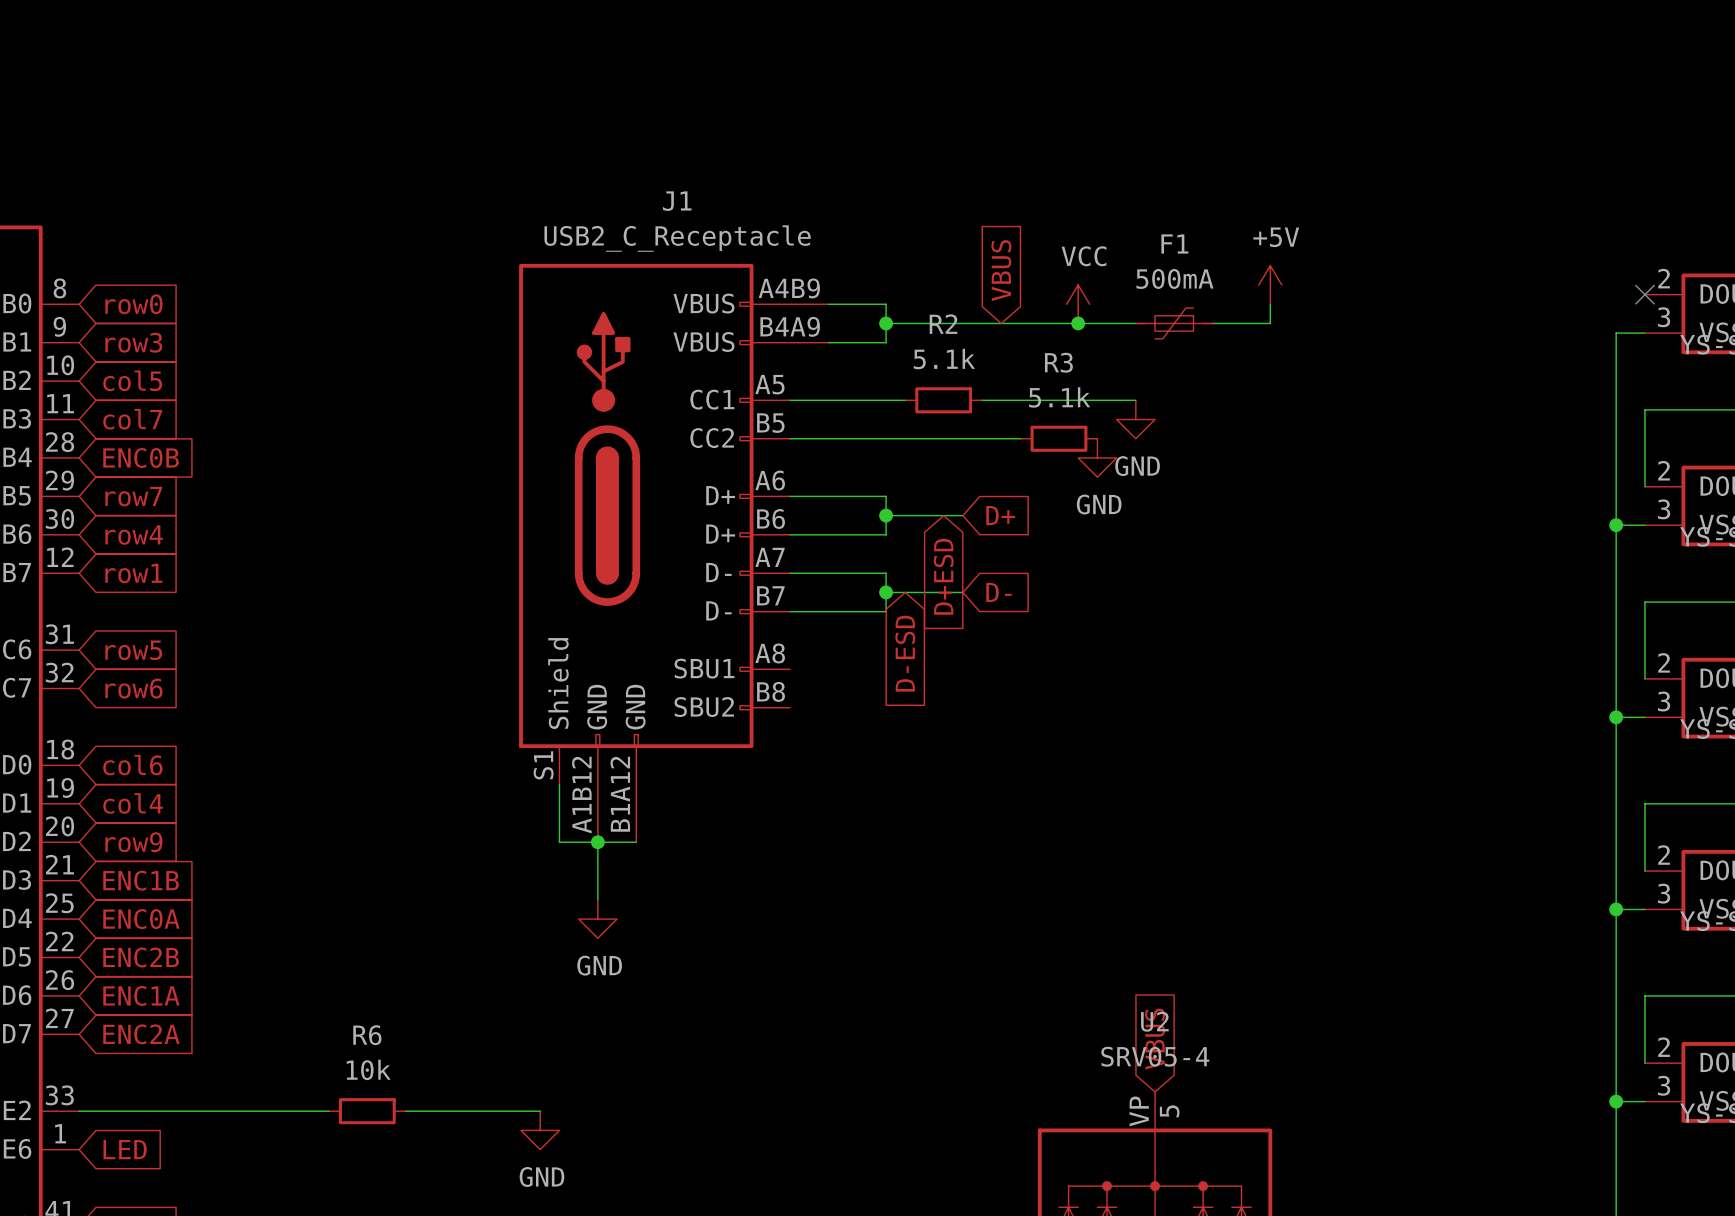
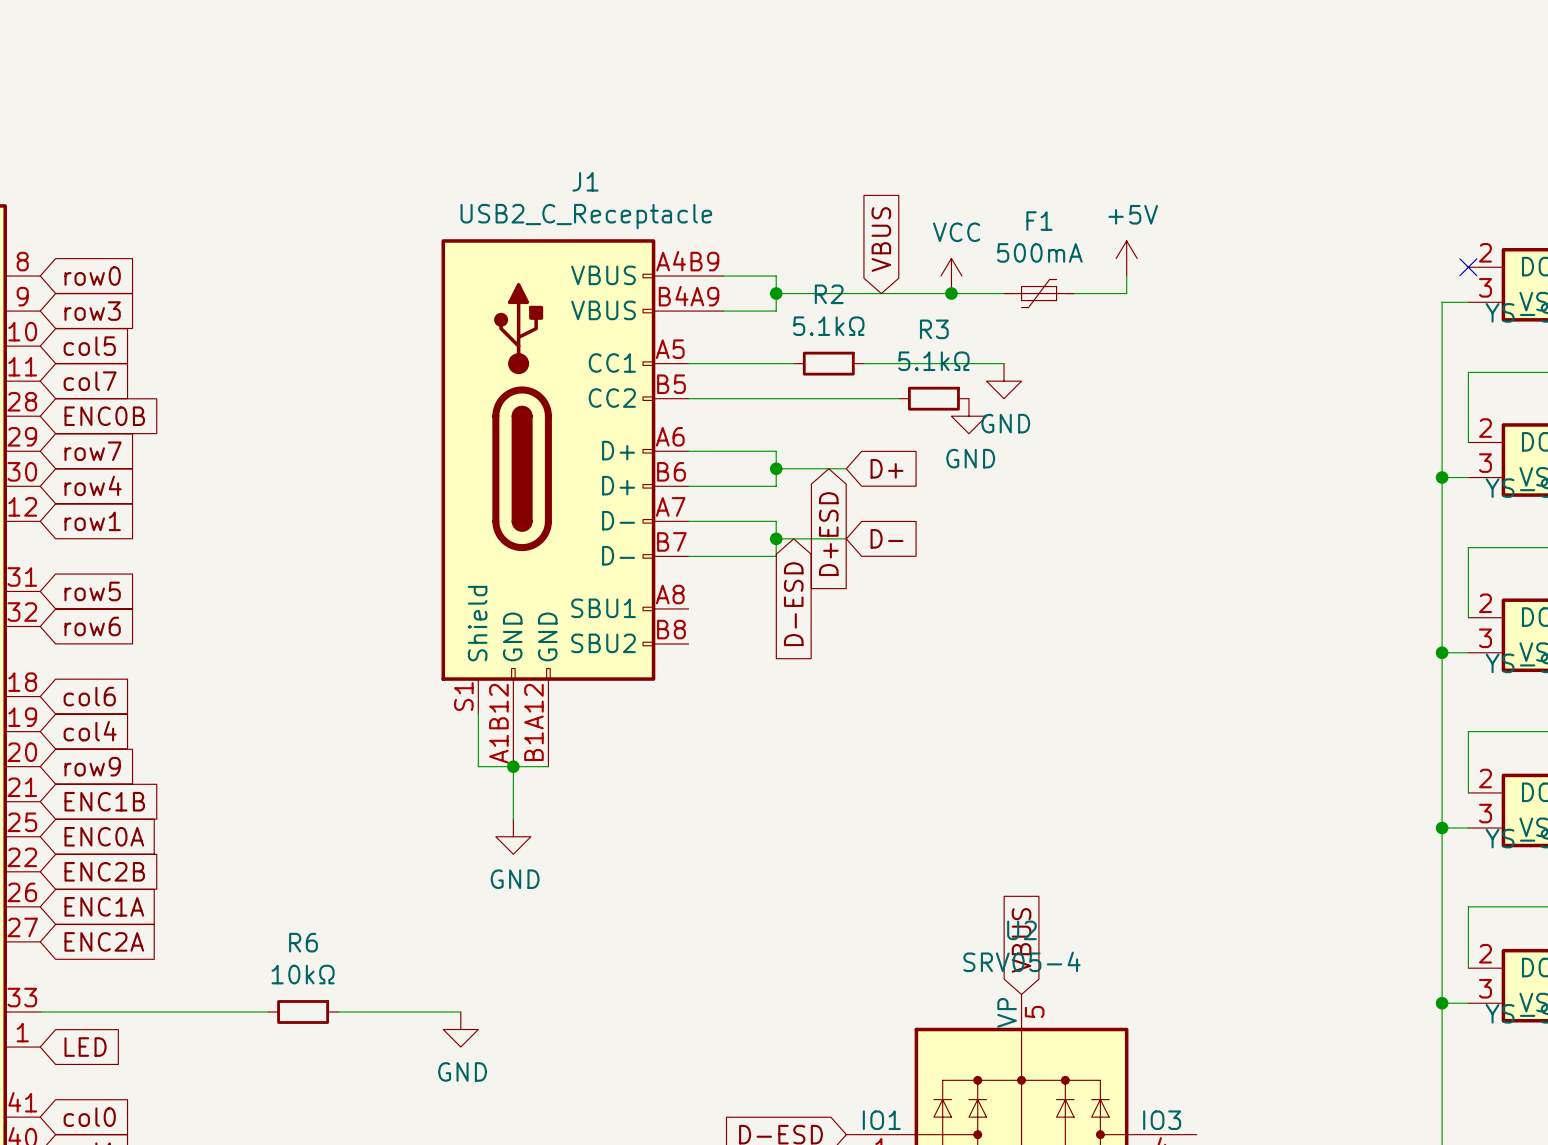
R2 value: 5.1k (944, 359) -> 5.1kΩ (828, 326)
R3 value: 5.1k (1059, 397) -> 5.1kΩ (933, 361)
R6 value: 10k (368, 1069) -> 10kΩ (303, 974)

